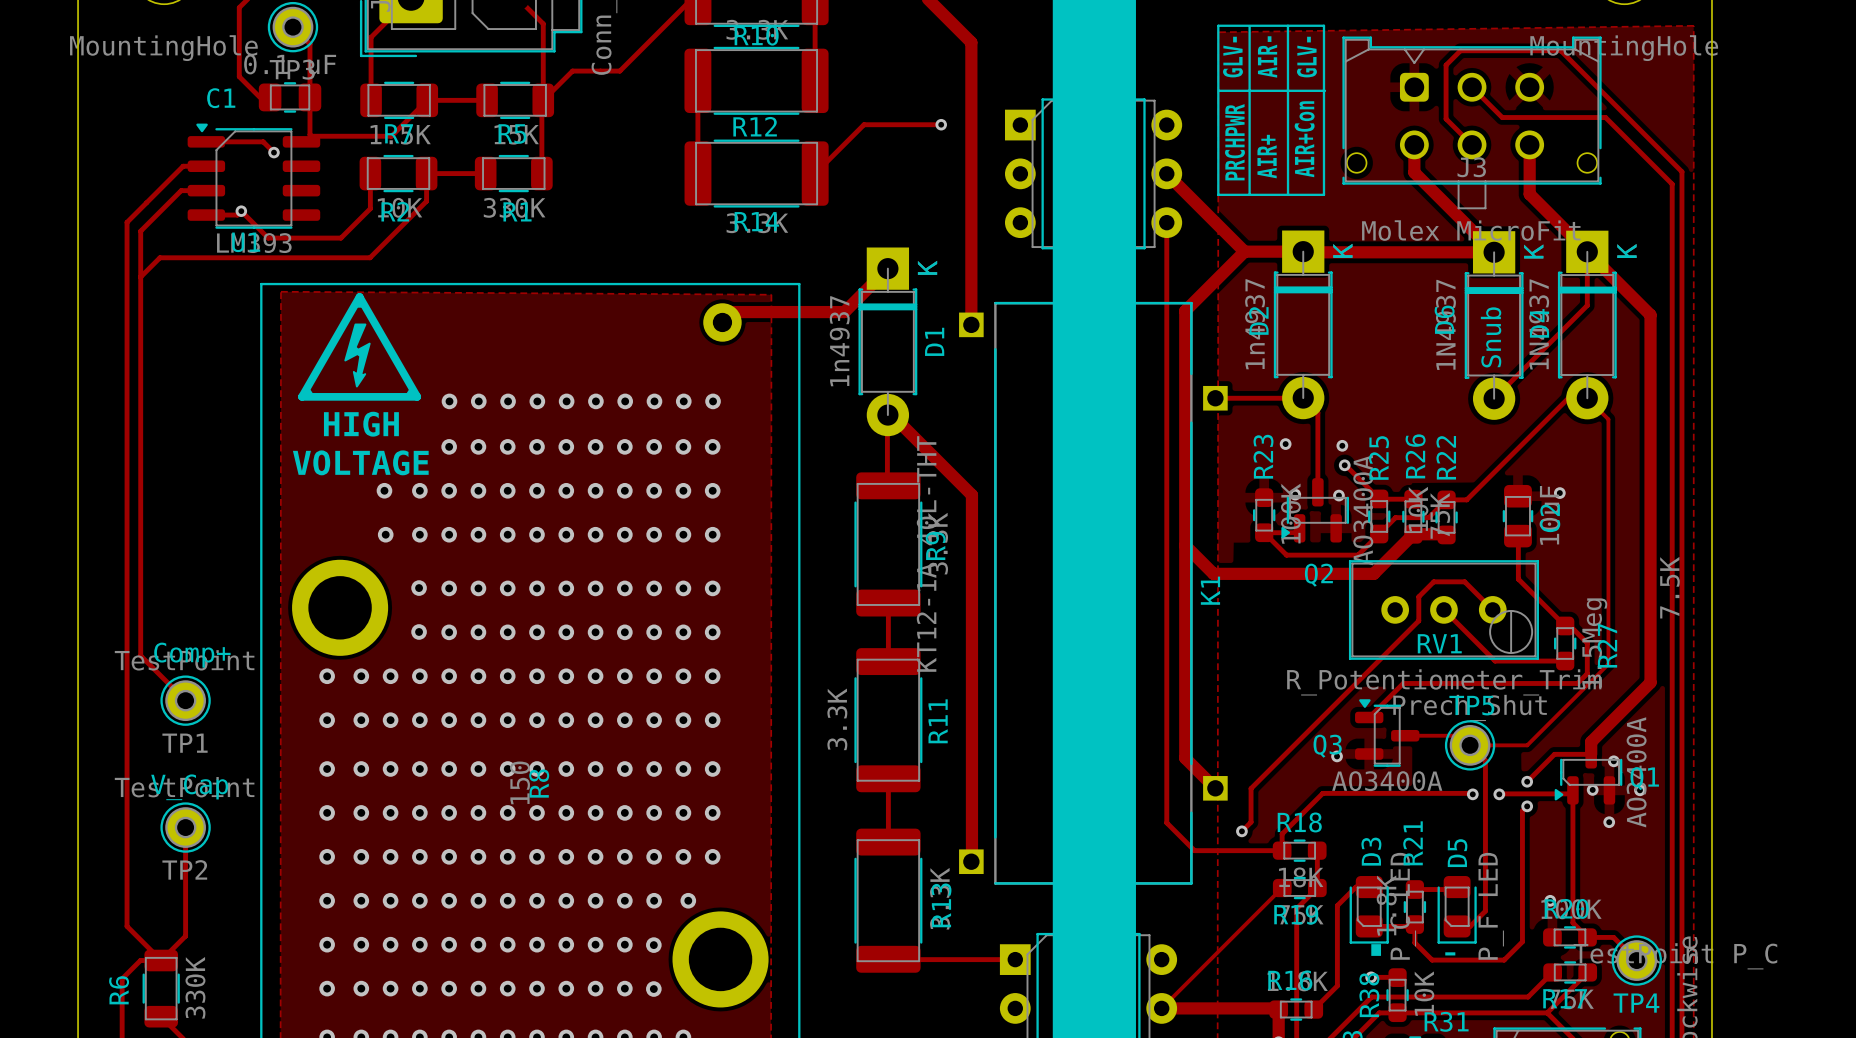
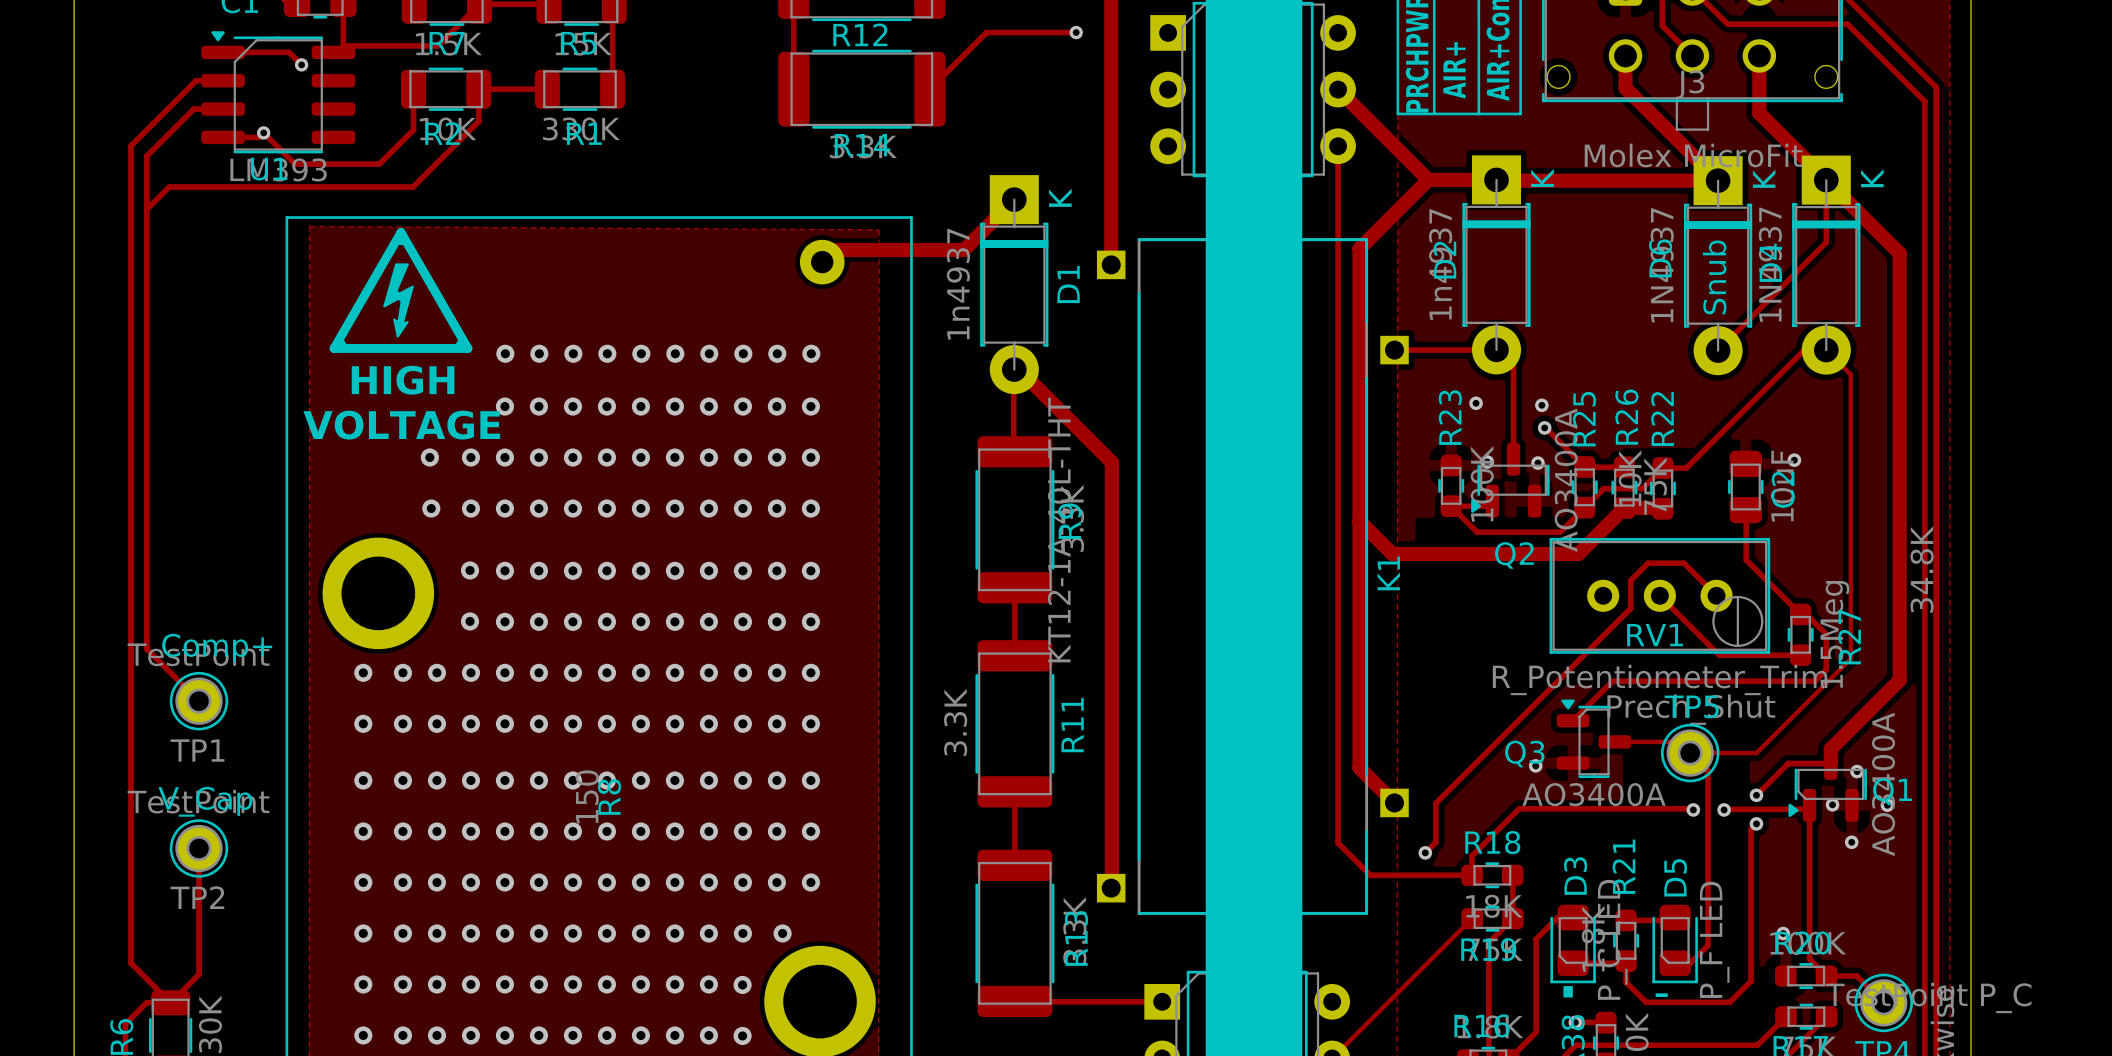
R25 value: 7.5K (1669, 587) -> 34.8K (1922, 569)

